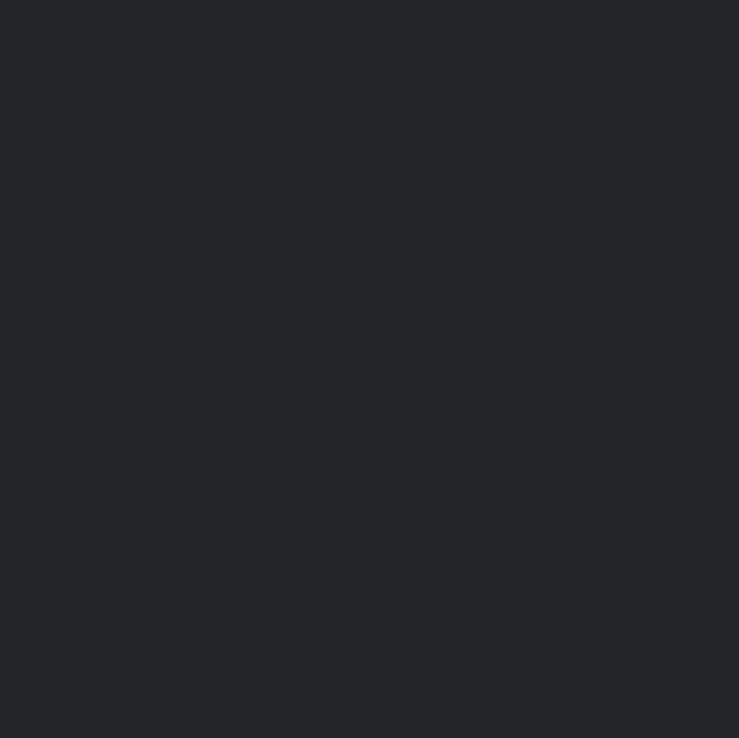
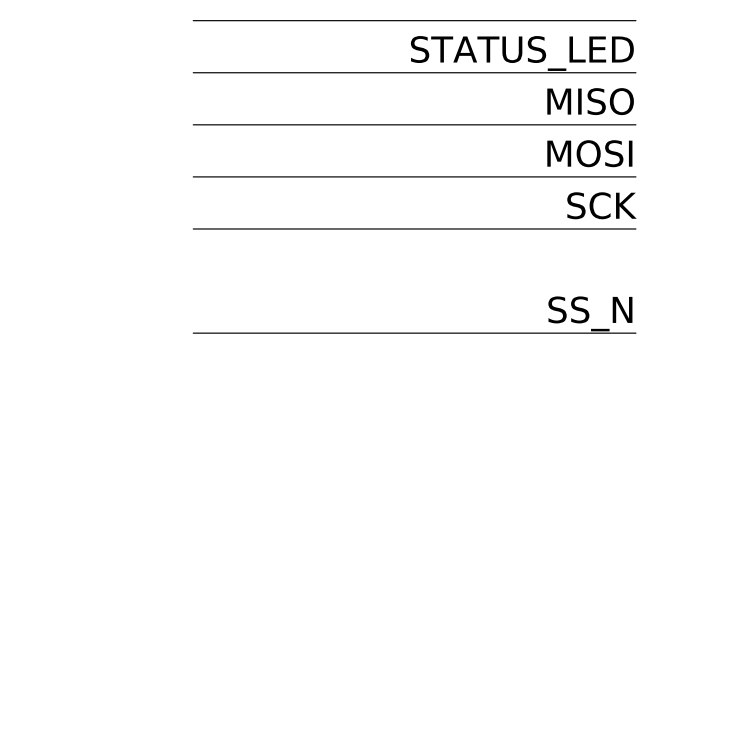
wire: none -> (193, 20) (635, 20)
label: none -> STATUS_LED (522, 53)
wire: none -> (193, 72) (635, 72)
label: none -> MISO (590, 101)
wire: none -> (193, 124) (635, 124)
label: none -> MOSI (589, 153)
wire: none -> (193, 176) (635, 176)
label: none -> SCK (601, 205)
wire: none -> (193, 228) (635, 228)
label: none -> SS_N (590, 313)
wire: none -> (193, 333) (635, 333)

